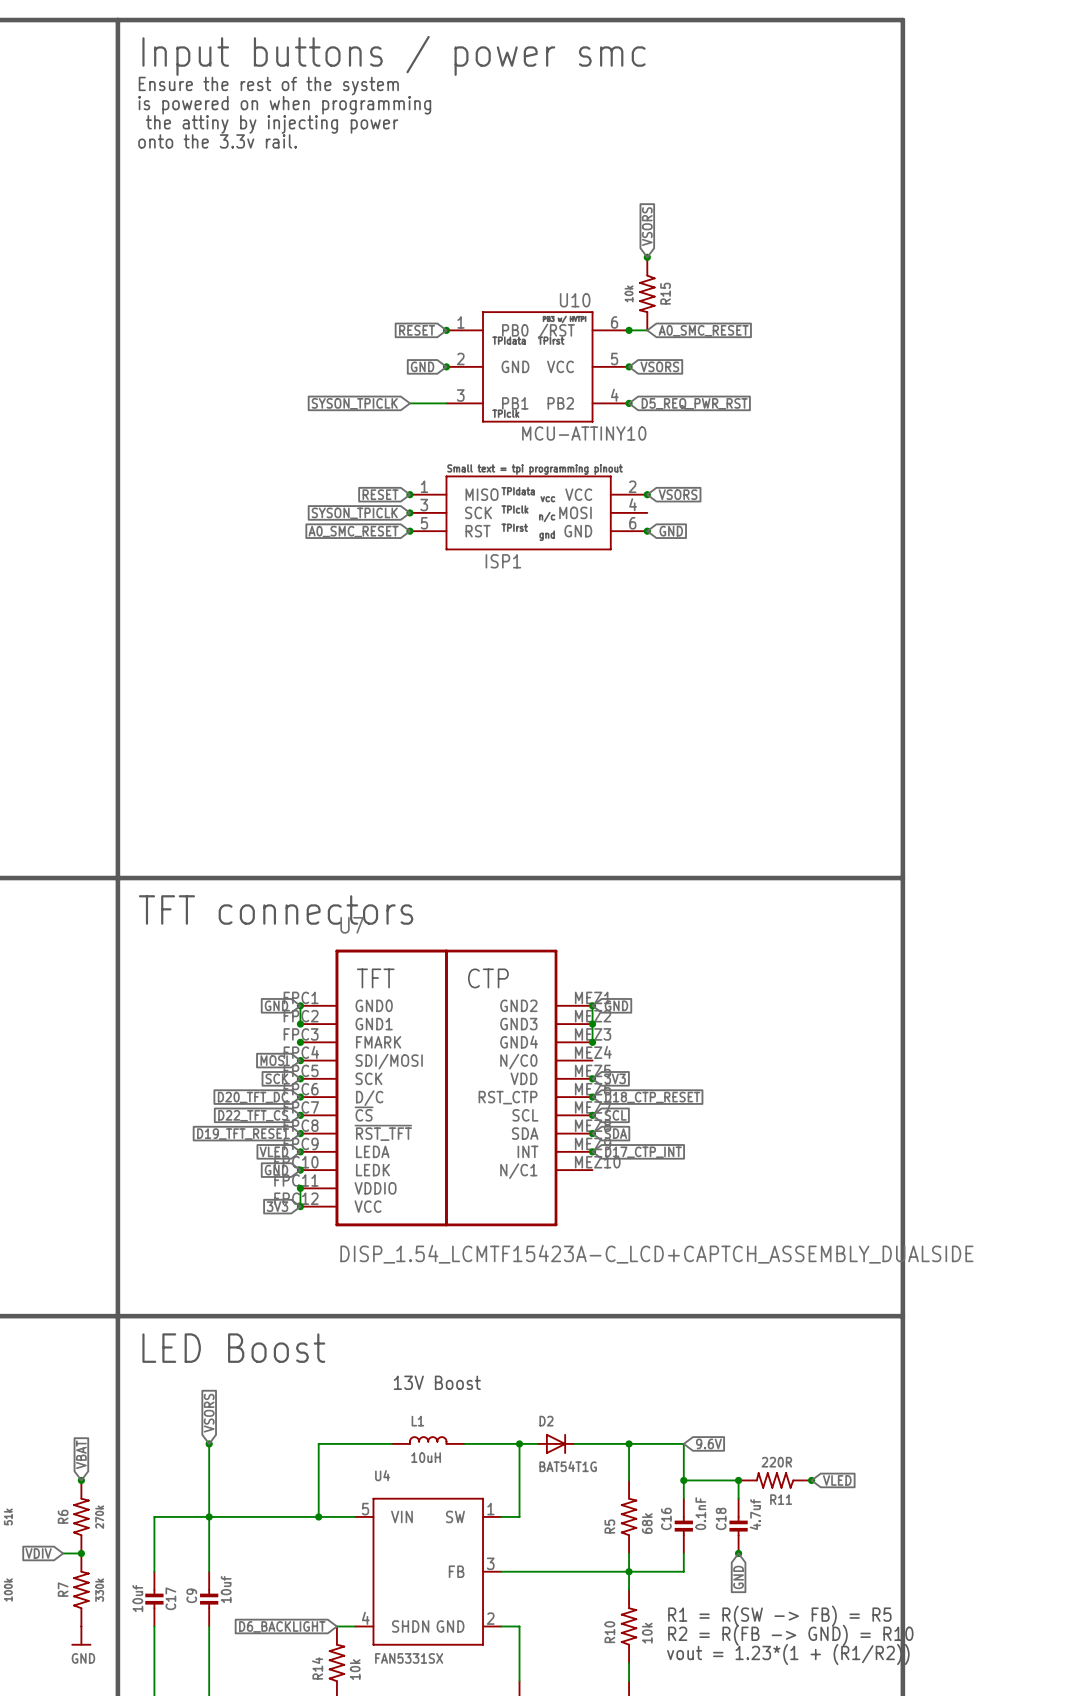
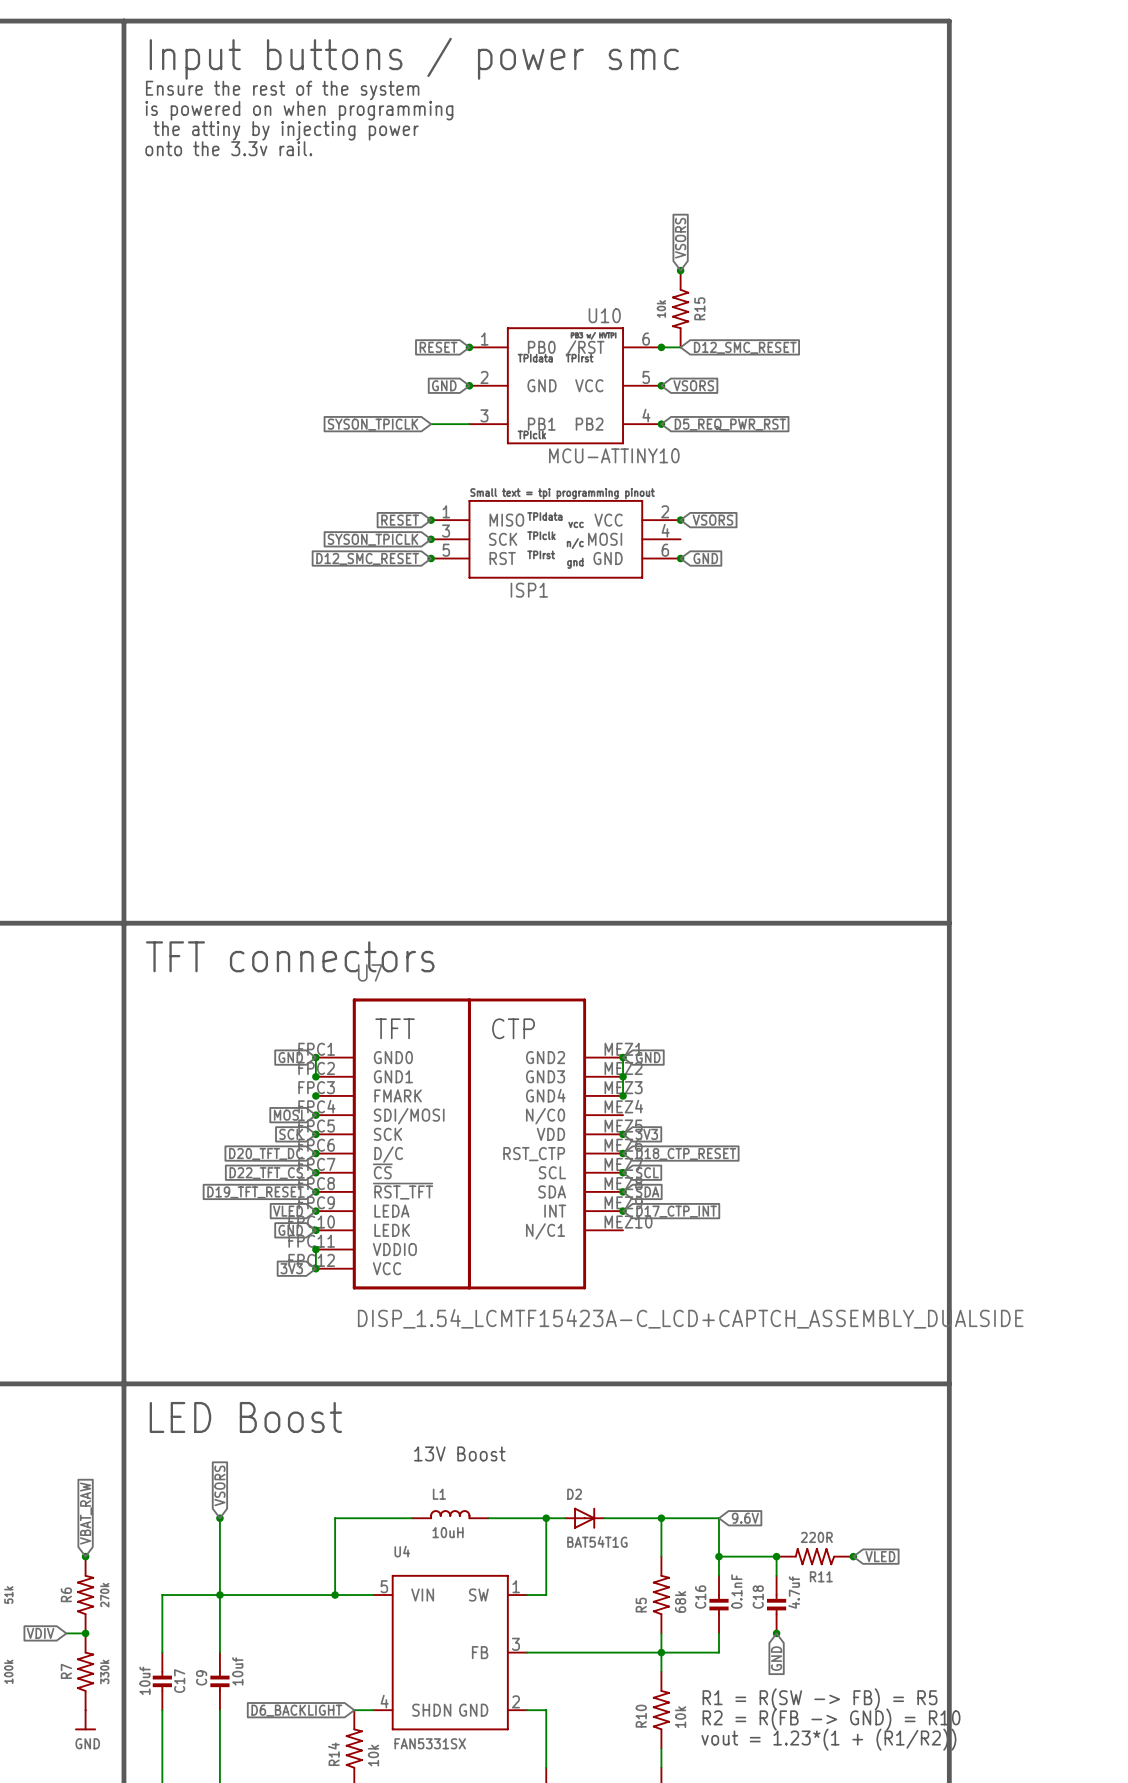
global label: A0_SMC_RESET (703, 330) -> D12_SMC_RESET (745, 347)
global label: A0_SMC_RESET (353, 531) -> D12_SMC_RESET (367, 558)
global label: VBAT (81, 1454) -> VBAT_RAW (86, 1513)

